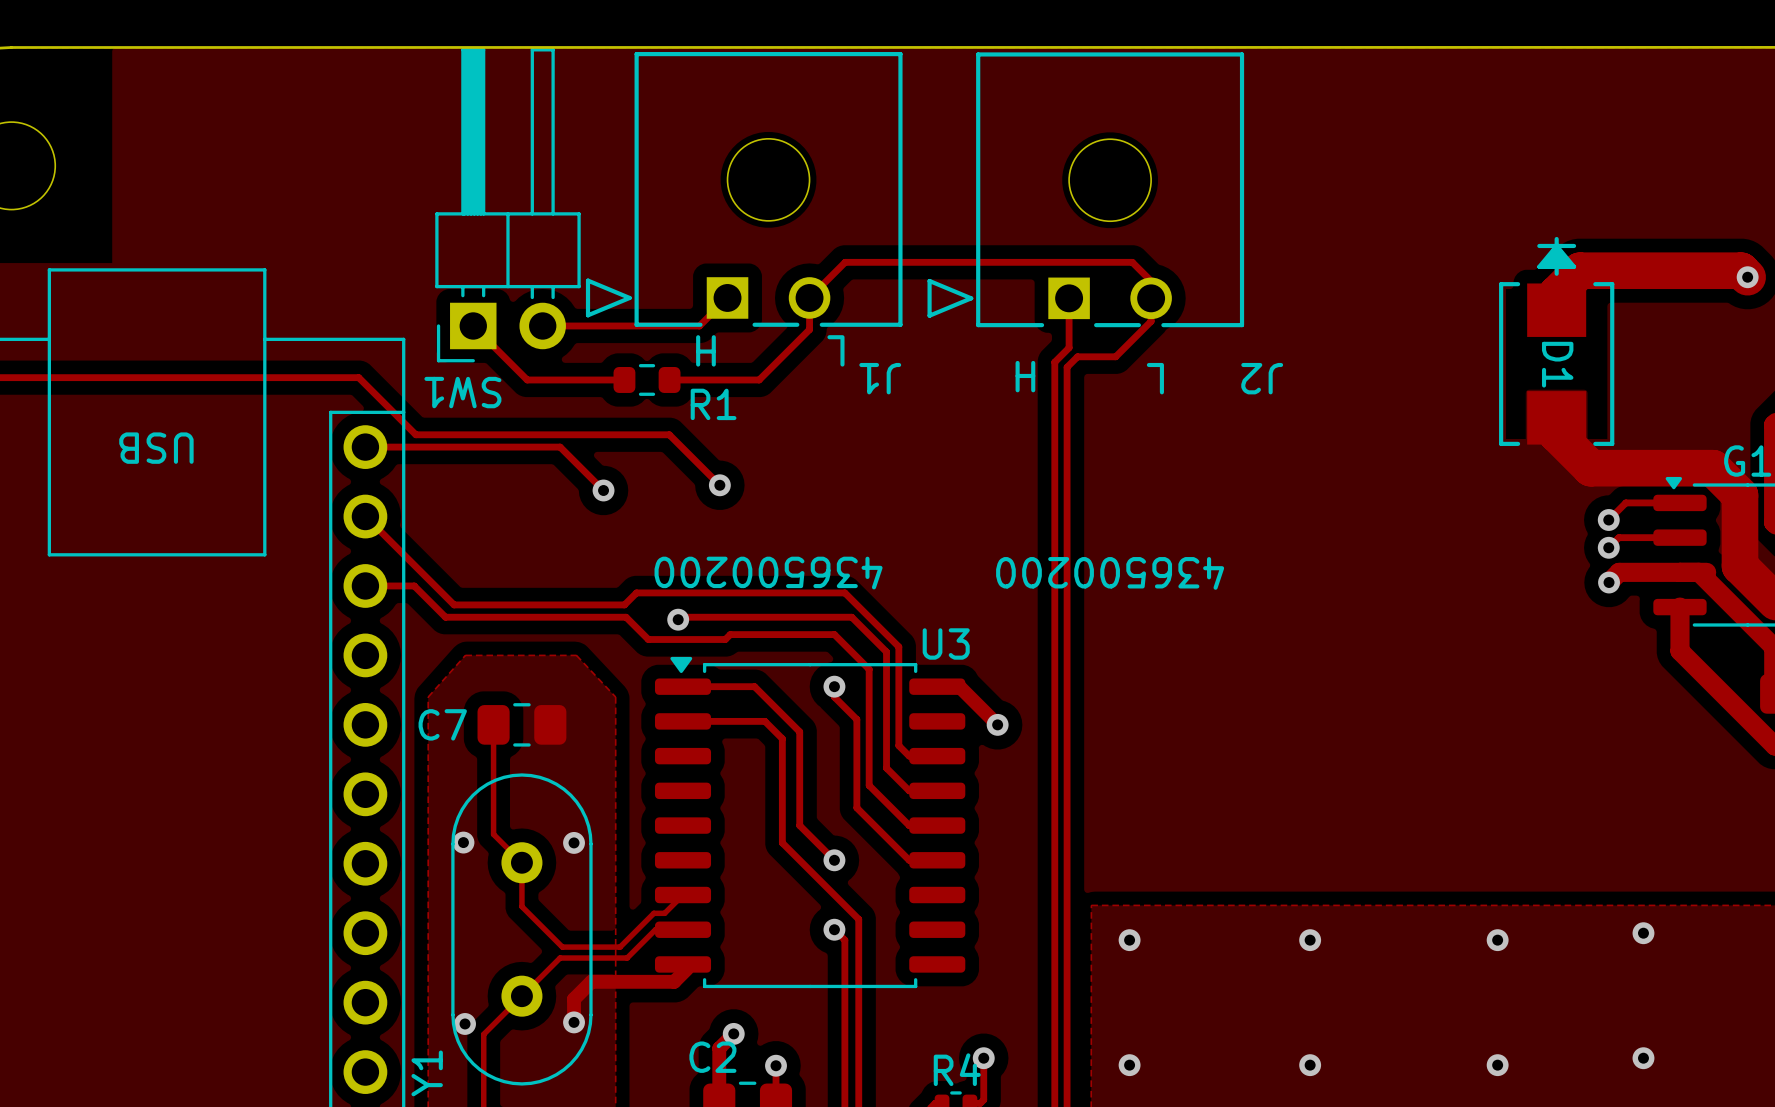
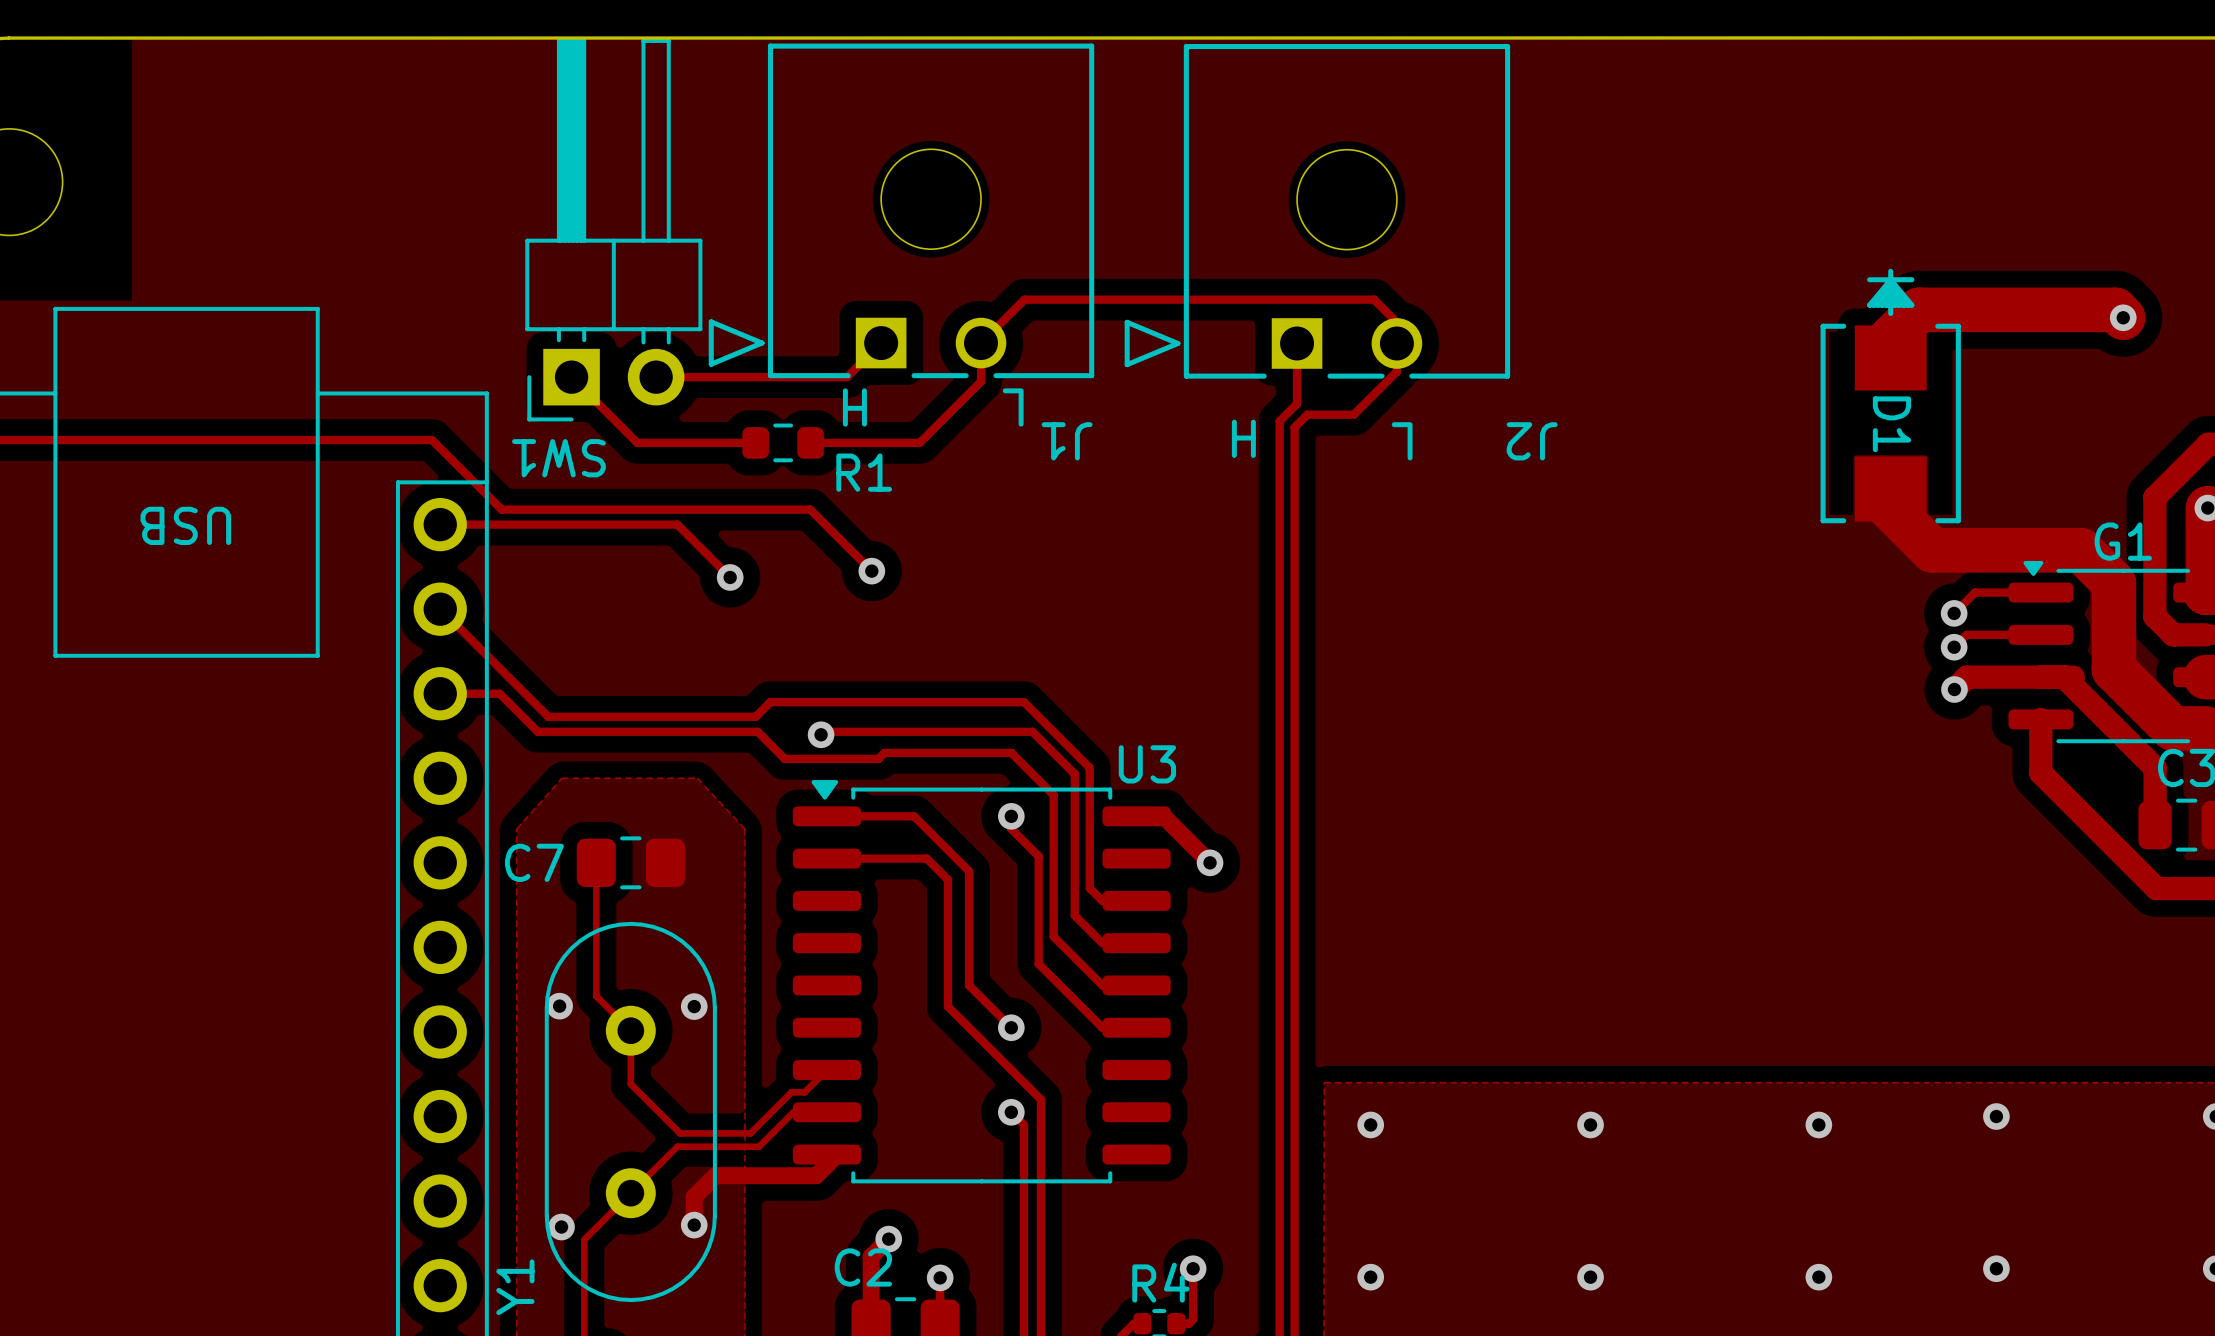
J1 text: 436500200 (768, 573) -> none
J2 text: 436500200 (1110, 573) -> none

